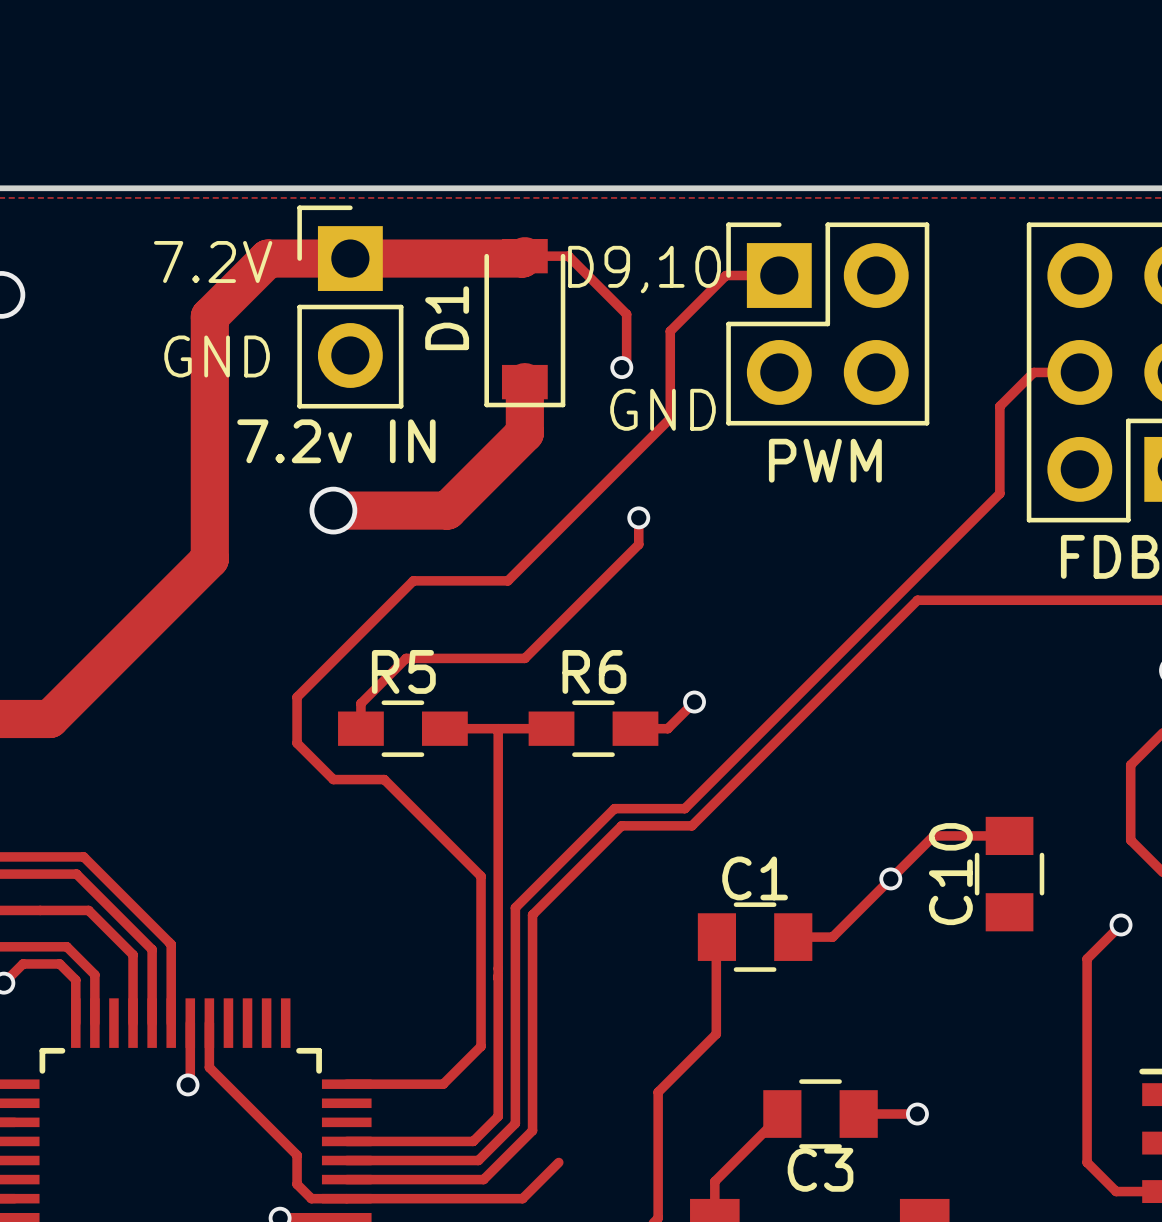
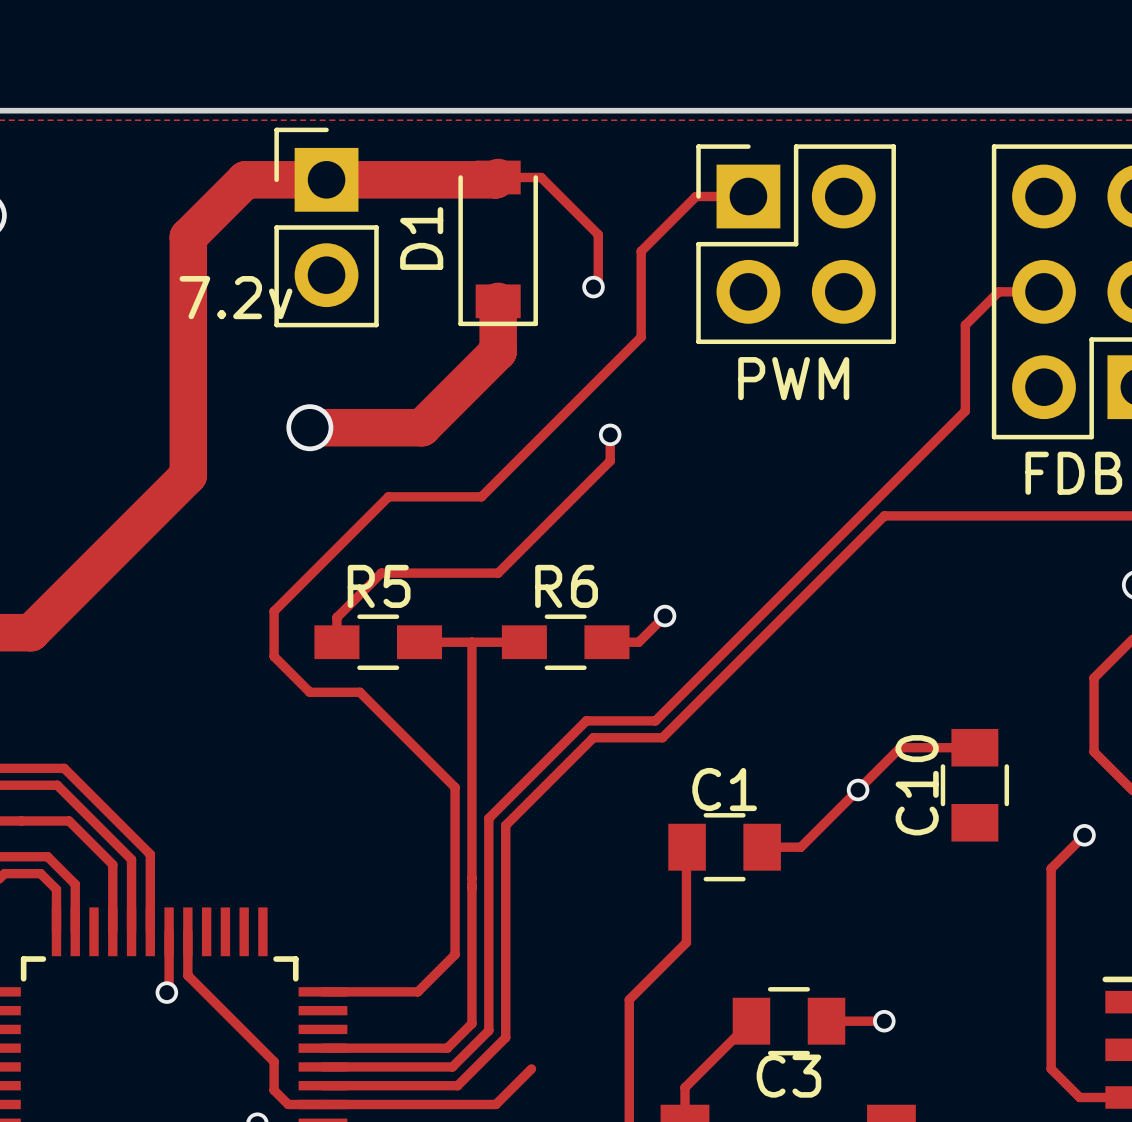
text: 7.2V (213, 261) -> none
text: D9,10 (644, 269) -> none
text: GND (217, 356) -> none
text: GND (663, 409) -> none
7.2v IN name: 7.2v IN (336, 441) -> 7.2v (235, 297)

